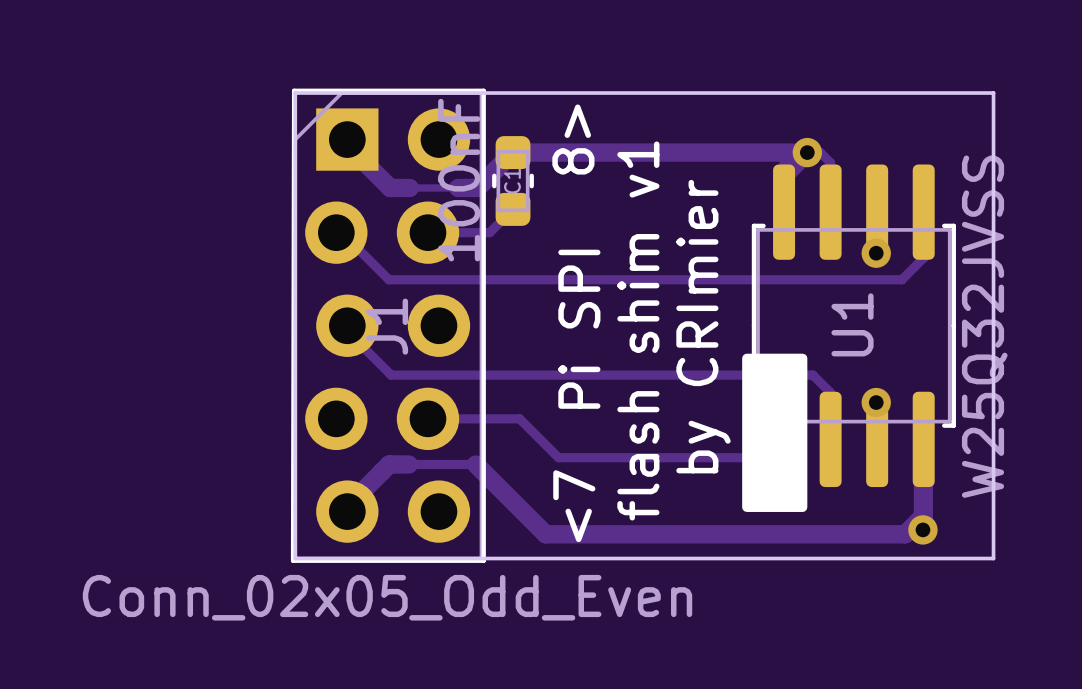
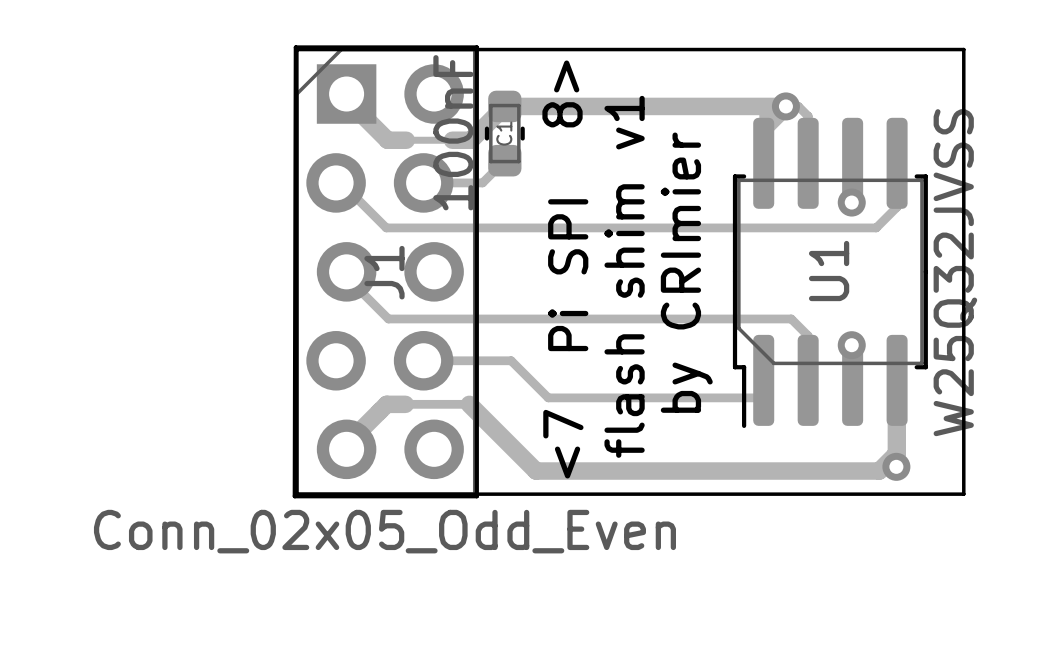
drawing: [742, 353, 808, 512] -> none

